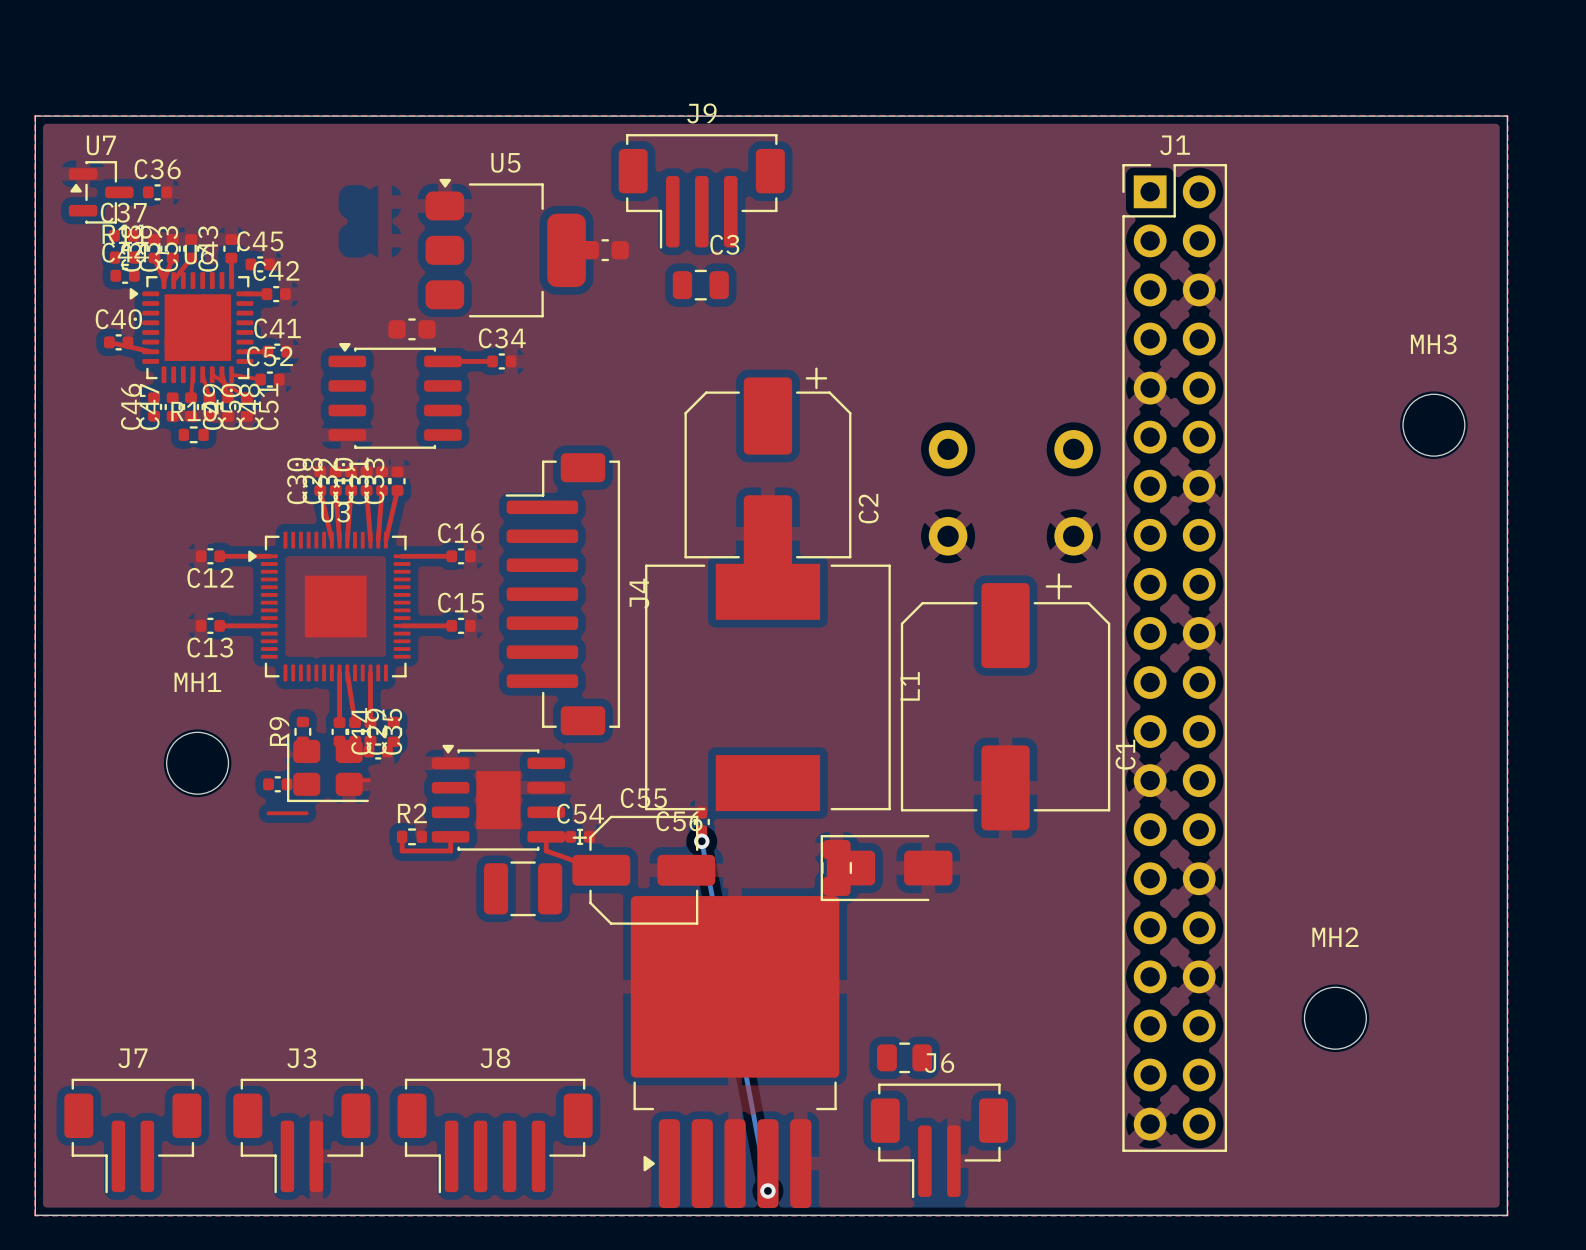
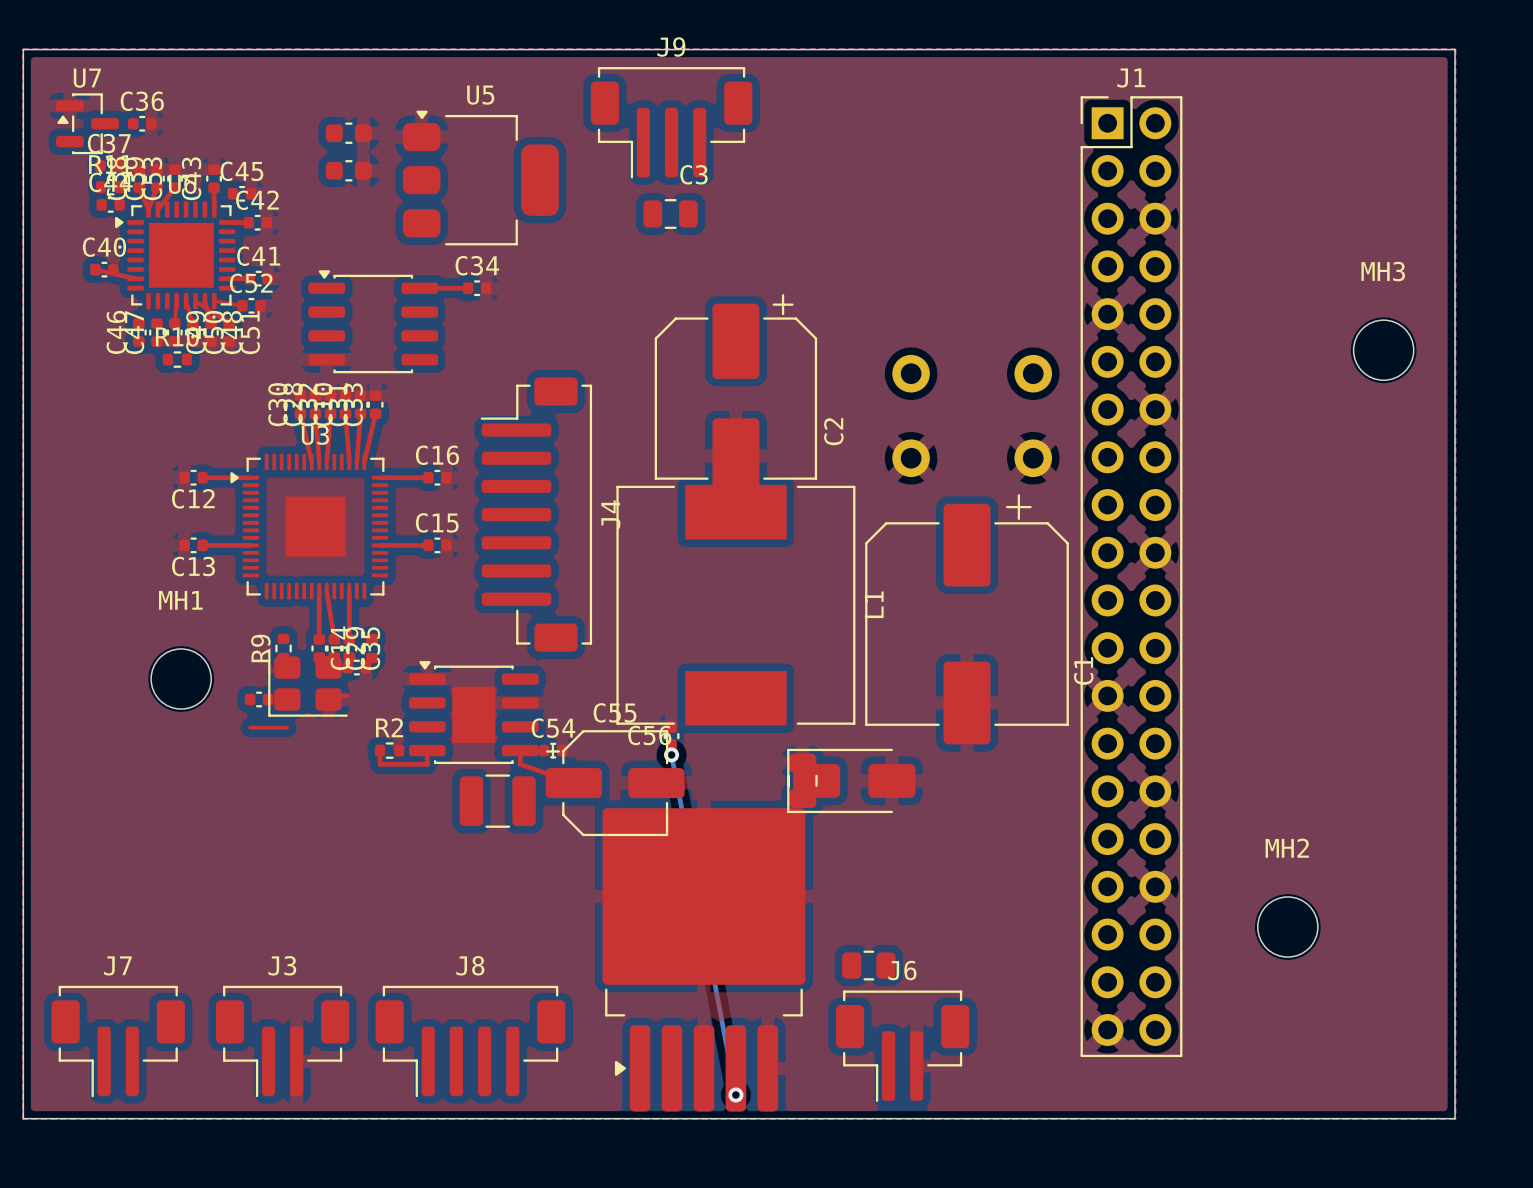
part: none -> (348, 133)
part: none -> (348, 170)
part: (605, 250) -> none
part: (412, 329) -> none

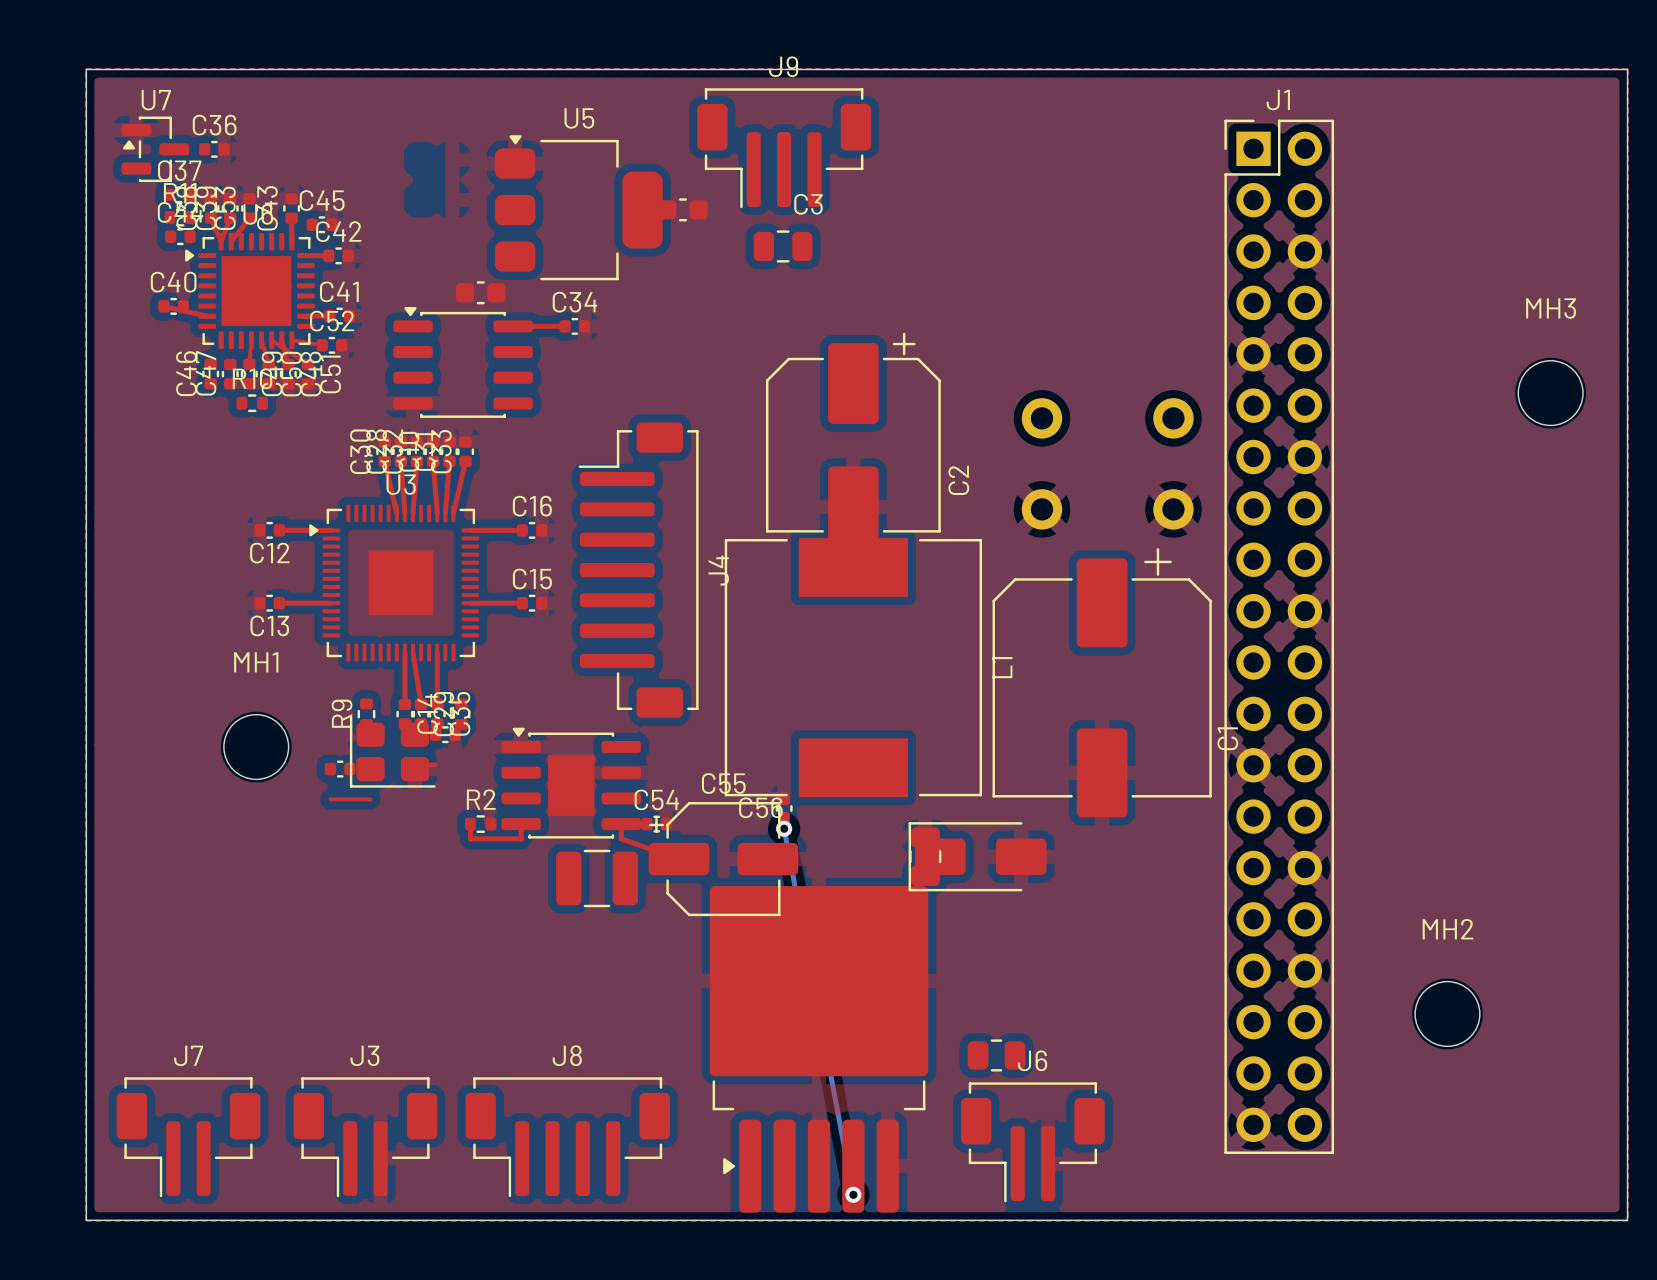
part: (348, 133) -> none
part: (348, 170) -> none
part: none -> (682, 209)
part: none -> (480, 292)

